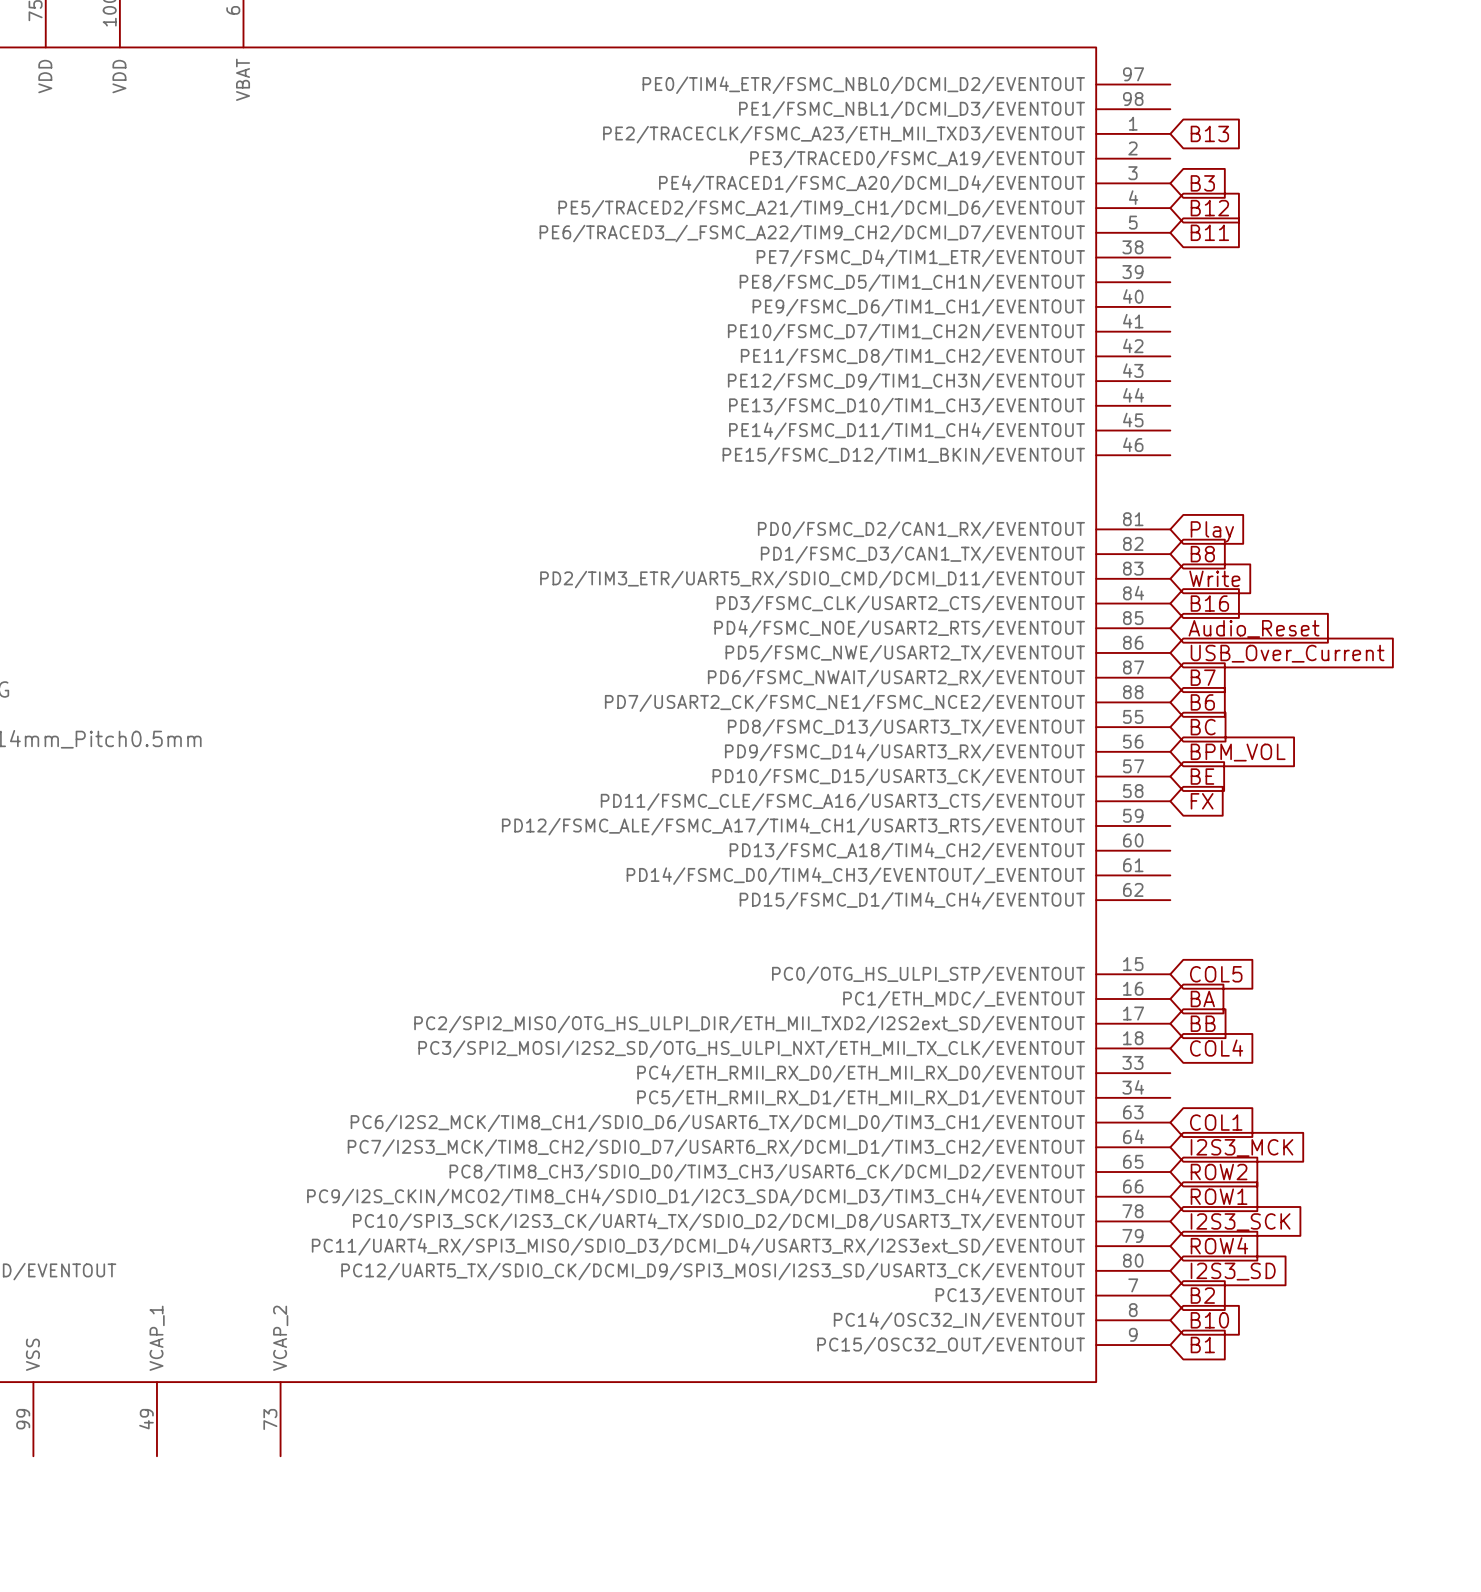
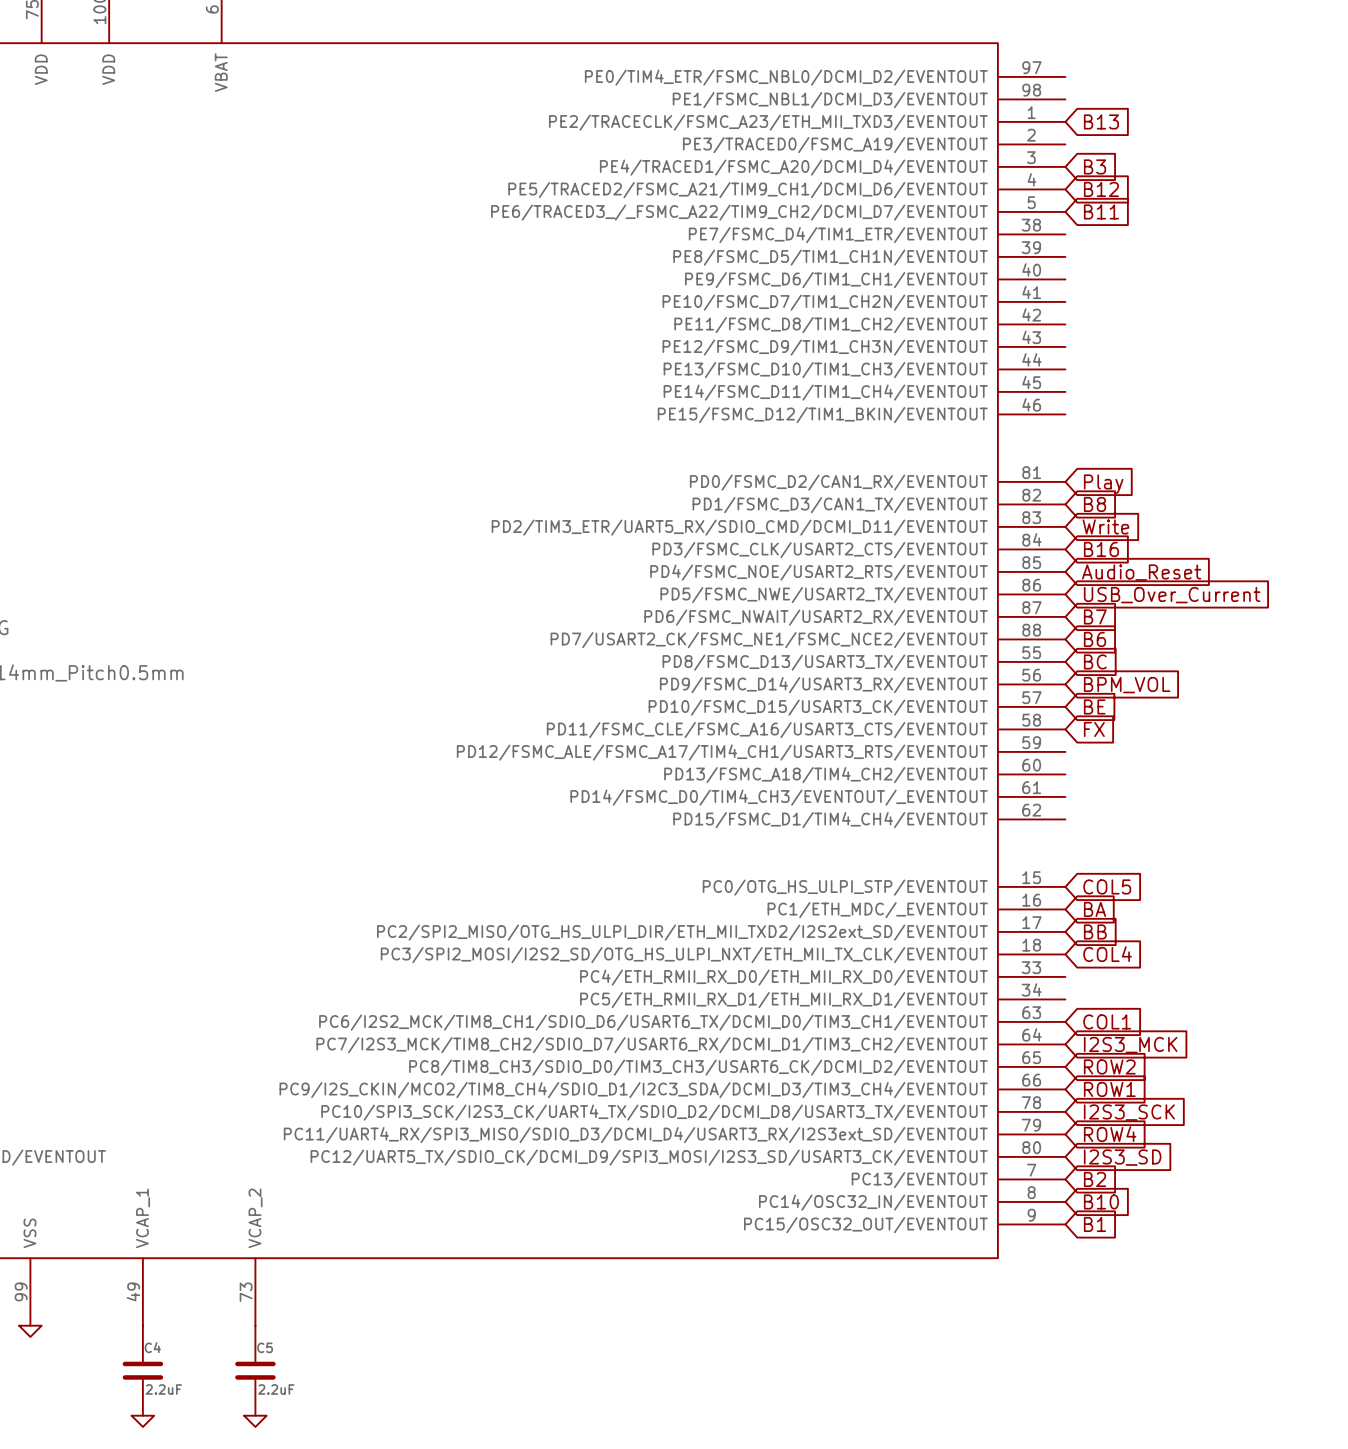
power symbol: none -> (30, 1331)
C4: none -> 2.2uF (142, 1370)
C5: none -> 2.2uF (255, 1370)
power symbol: none -> (142, 1421)
power symbol: none -> (255, 1421)

